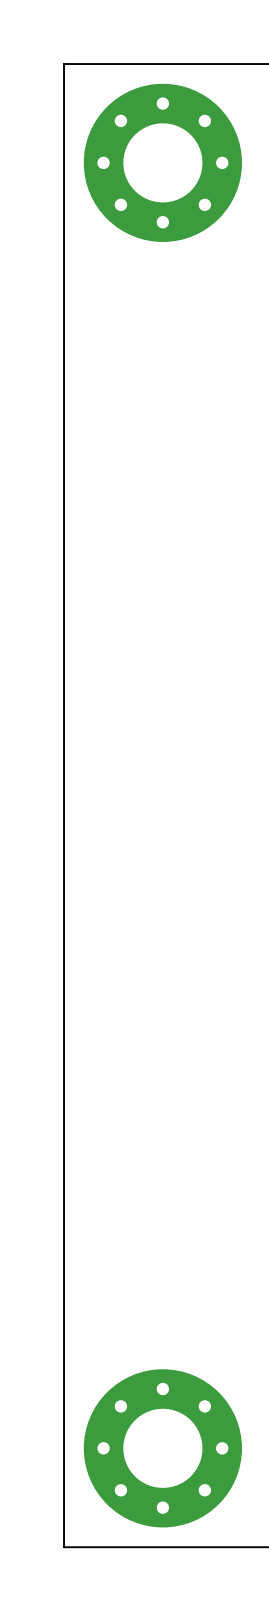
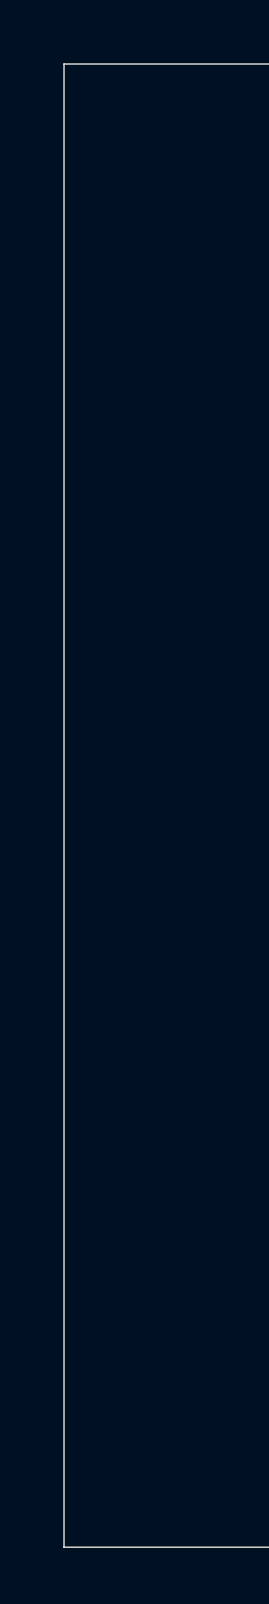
part: (162, 162) -> none
part: (162, 1448) -> none

